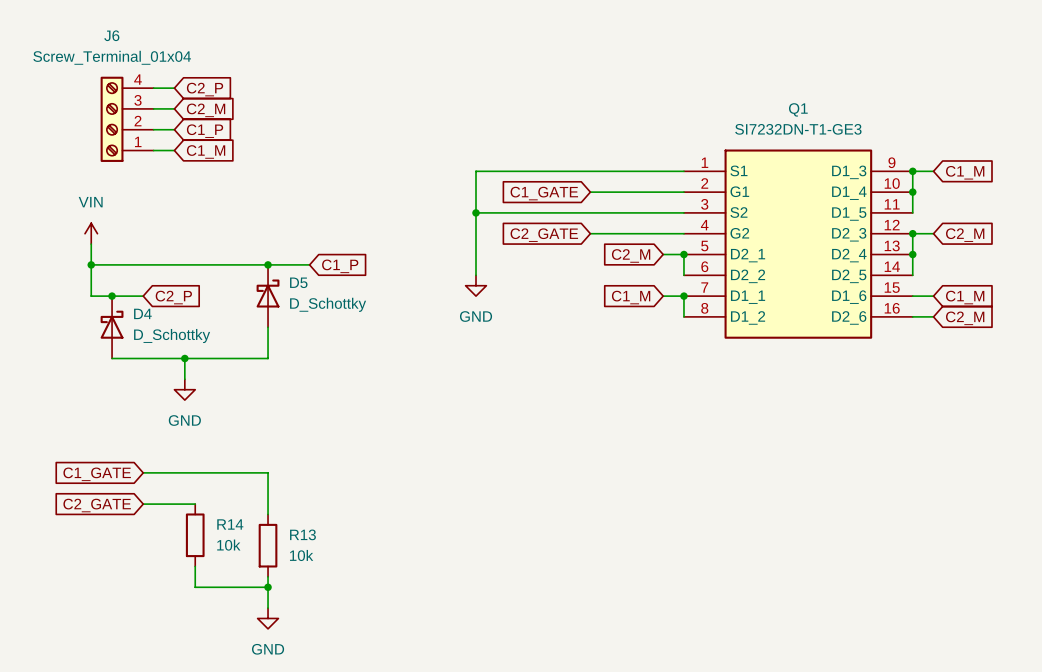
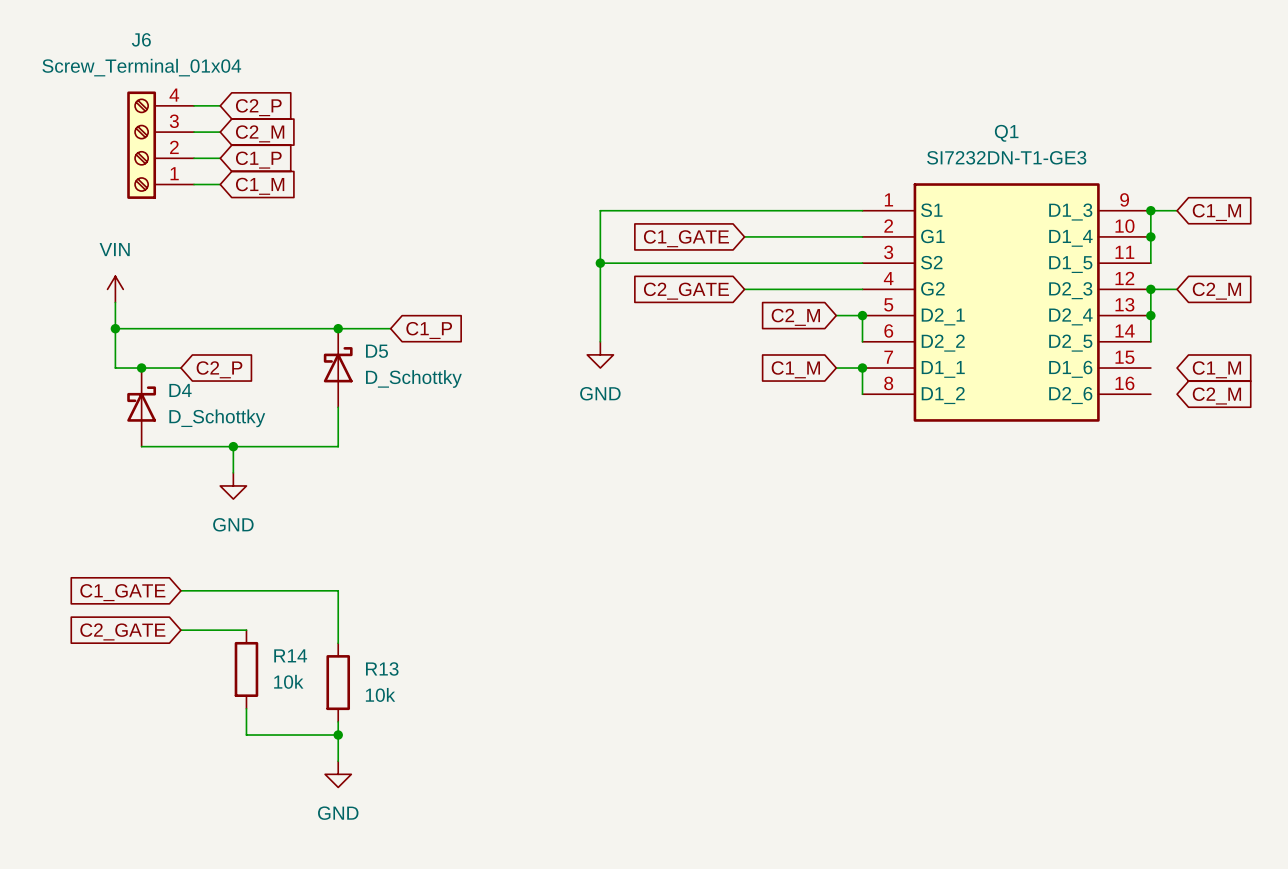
wire: (912, 296) (933, 296) -> none
wire: (912, 316) (933, 316) -> none

